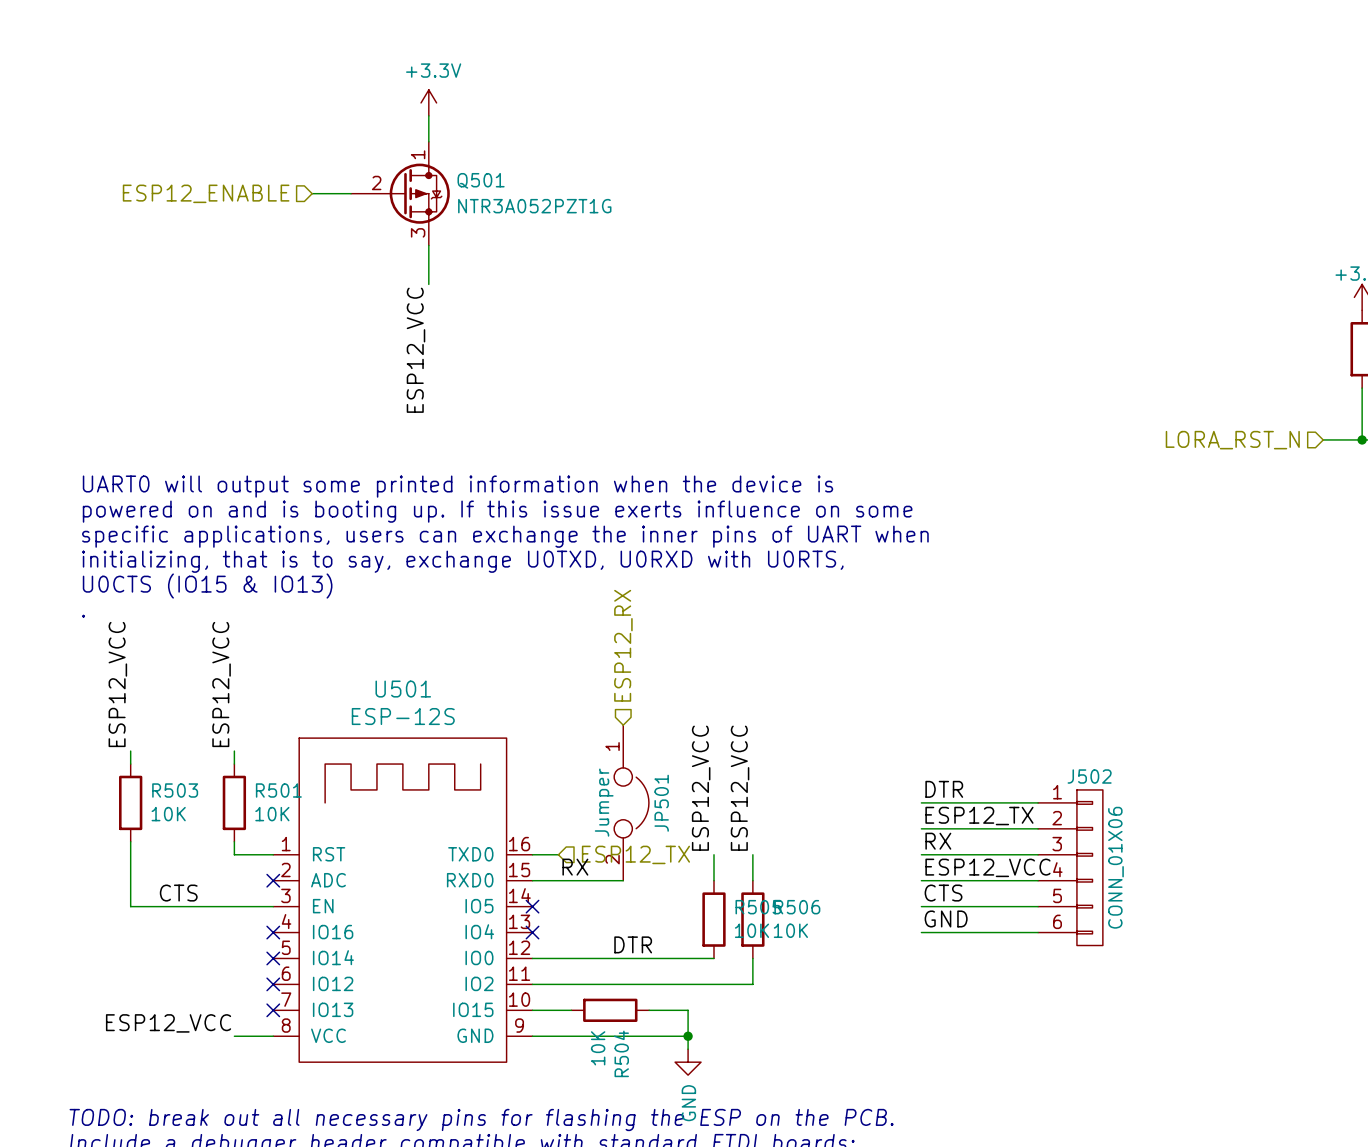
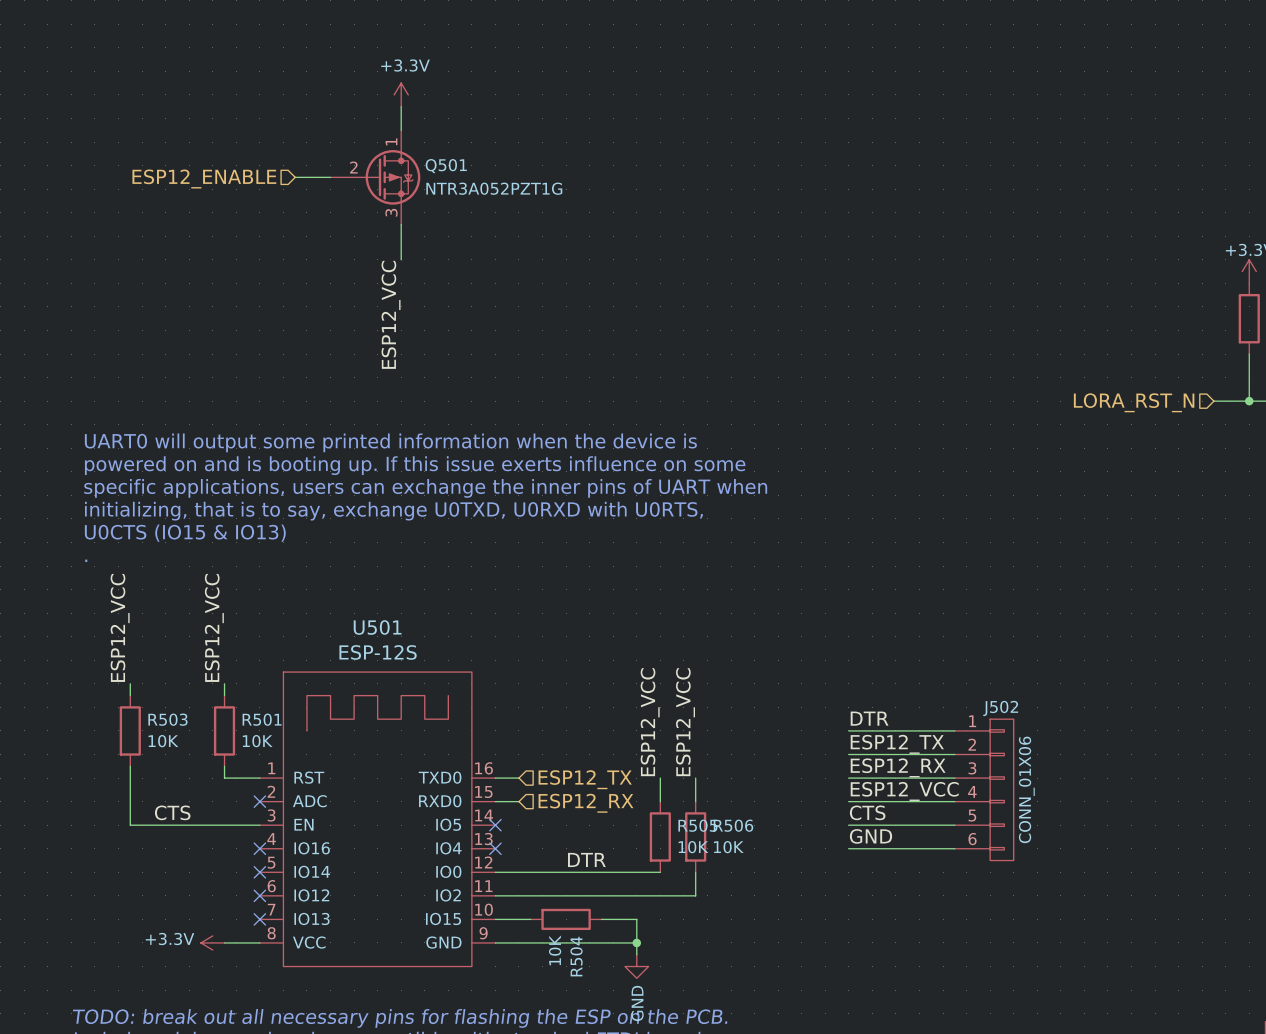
hierarchical label rotation: 0° (623, 645) -> 90° clockwise (585, 803)
hierarchical label position: ESP12_RX (623, 645) -> ESP12_RX (585, 803)
JP501: Jumper (631, 802) -> none
label: RX (938, 841) -> ESP12_RX (898, 767)
label: RX (575, 867) -> none
wire: (558, 880) (623, 880) -> none
label: ESP12_VCC (168, 1023) -> none
power symbol: none -> +3.3V (212, 942)

